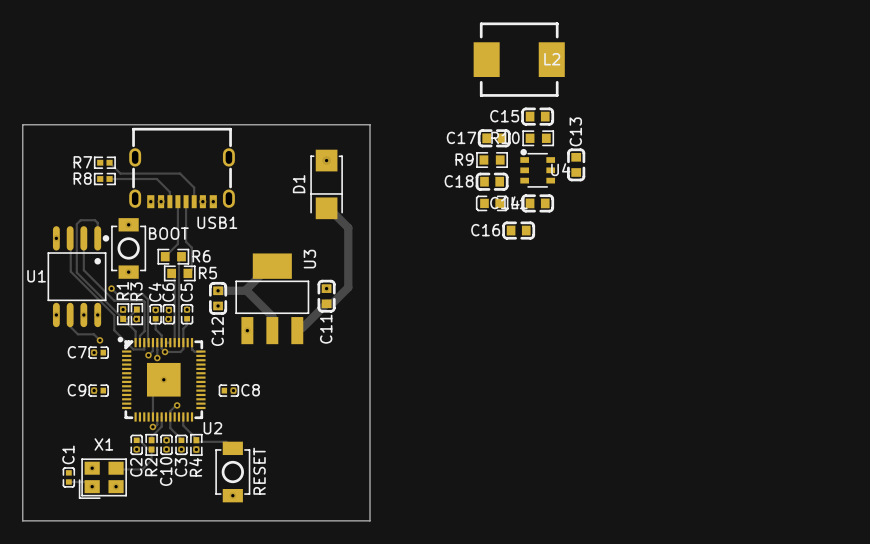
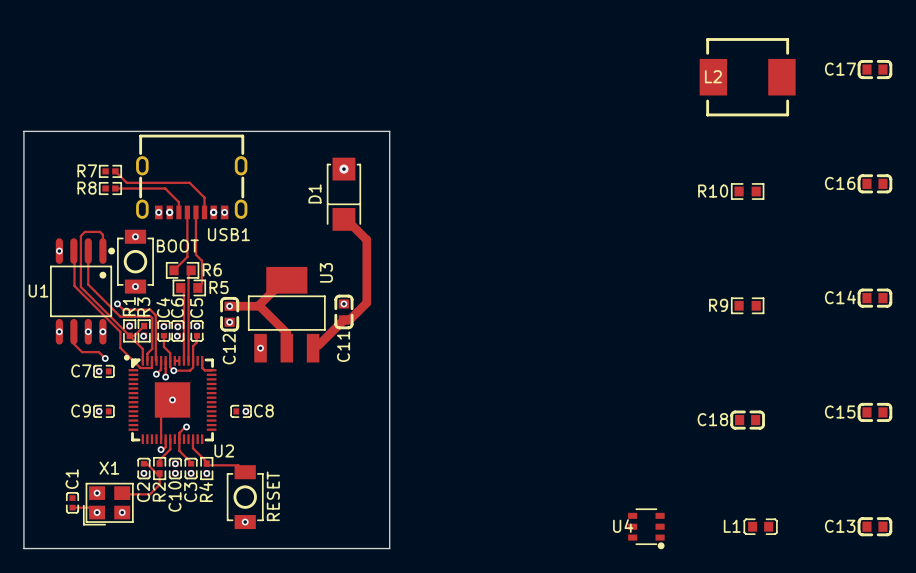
L2 rotation: 0° (519, 59) -> 180° (747, 77)
L2 position: (519, 59) -> (747, 77)
C15 position: (537, 116) -> (874, 412)
C13 name position: C13 (575, 131) -> C13 (840, 526)
C17 position: (494, 138) -> (874, 69)
R10 position: (538, 138) -> (747, 191)
R9 position: (492, 160) -> (747, 305)
C13 rotation: 0° (576, 164) -> 90° clockwise (874, 526)
C13 position: (576, 164) -> (874, 526)
U4 rotation: 0° (537, 168) -> 180° (646, 528)
U4 position: (537, 168) -> (646, 528)
C18 position: (492, 181) -> (747, 420)
L1 rotation: 0° (492, 203) -> 180° (760, 526)
L1 position: (492, 203) -> (760, 526)
C14 position: (537, 203) -> (874, 298)
C16 position: (518, 230) -> (874, 183)

